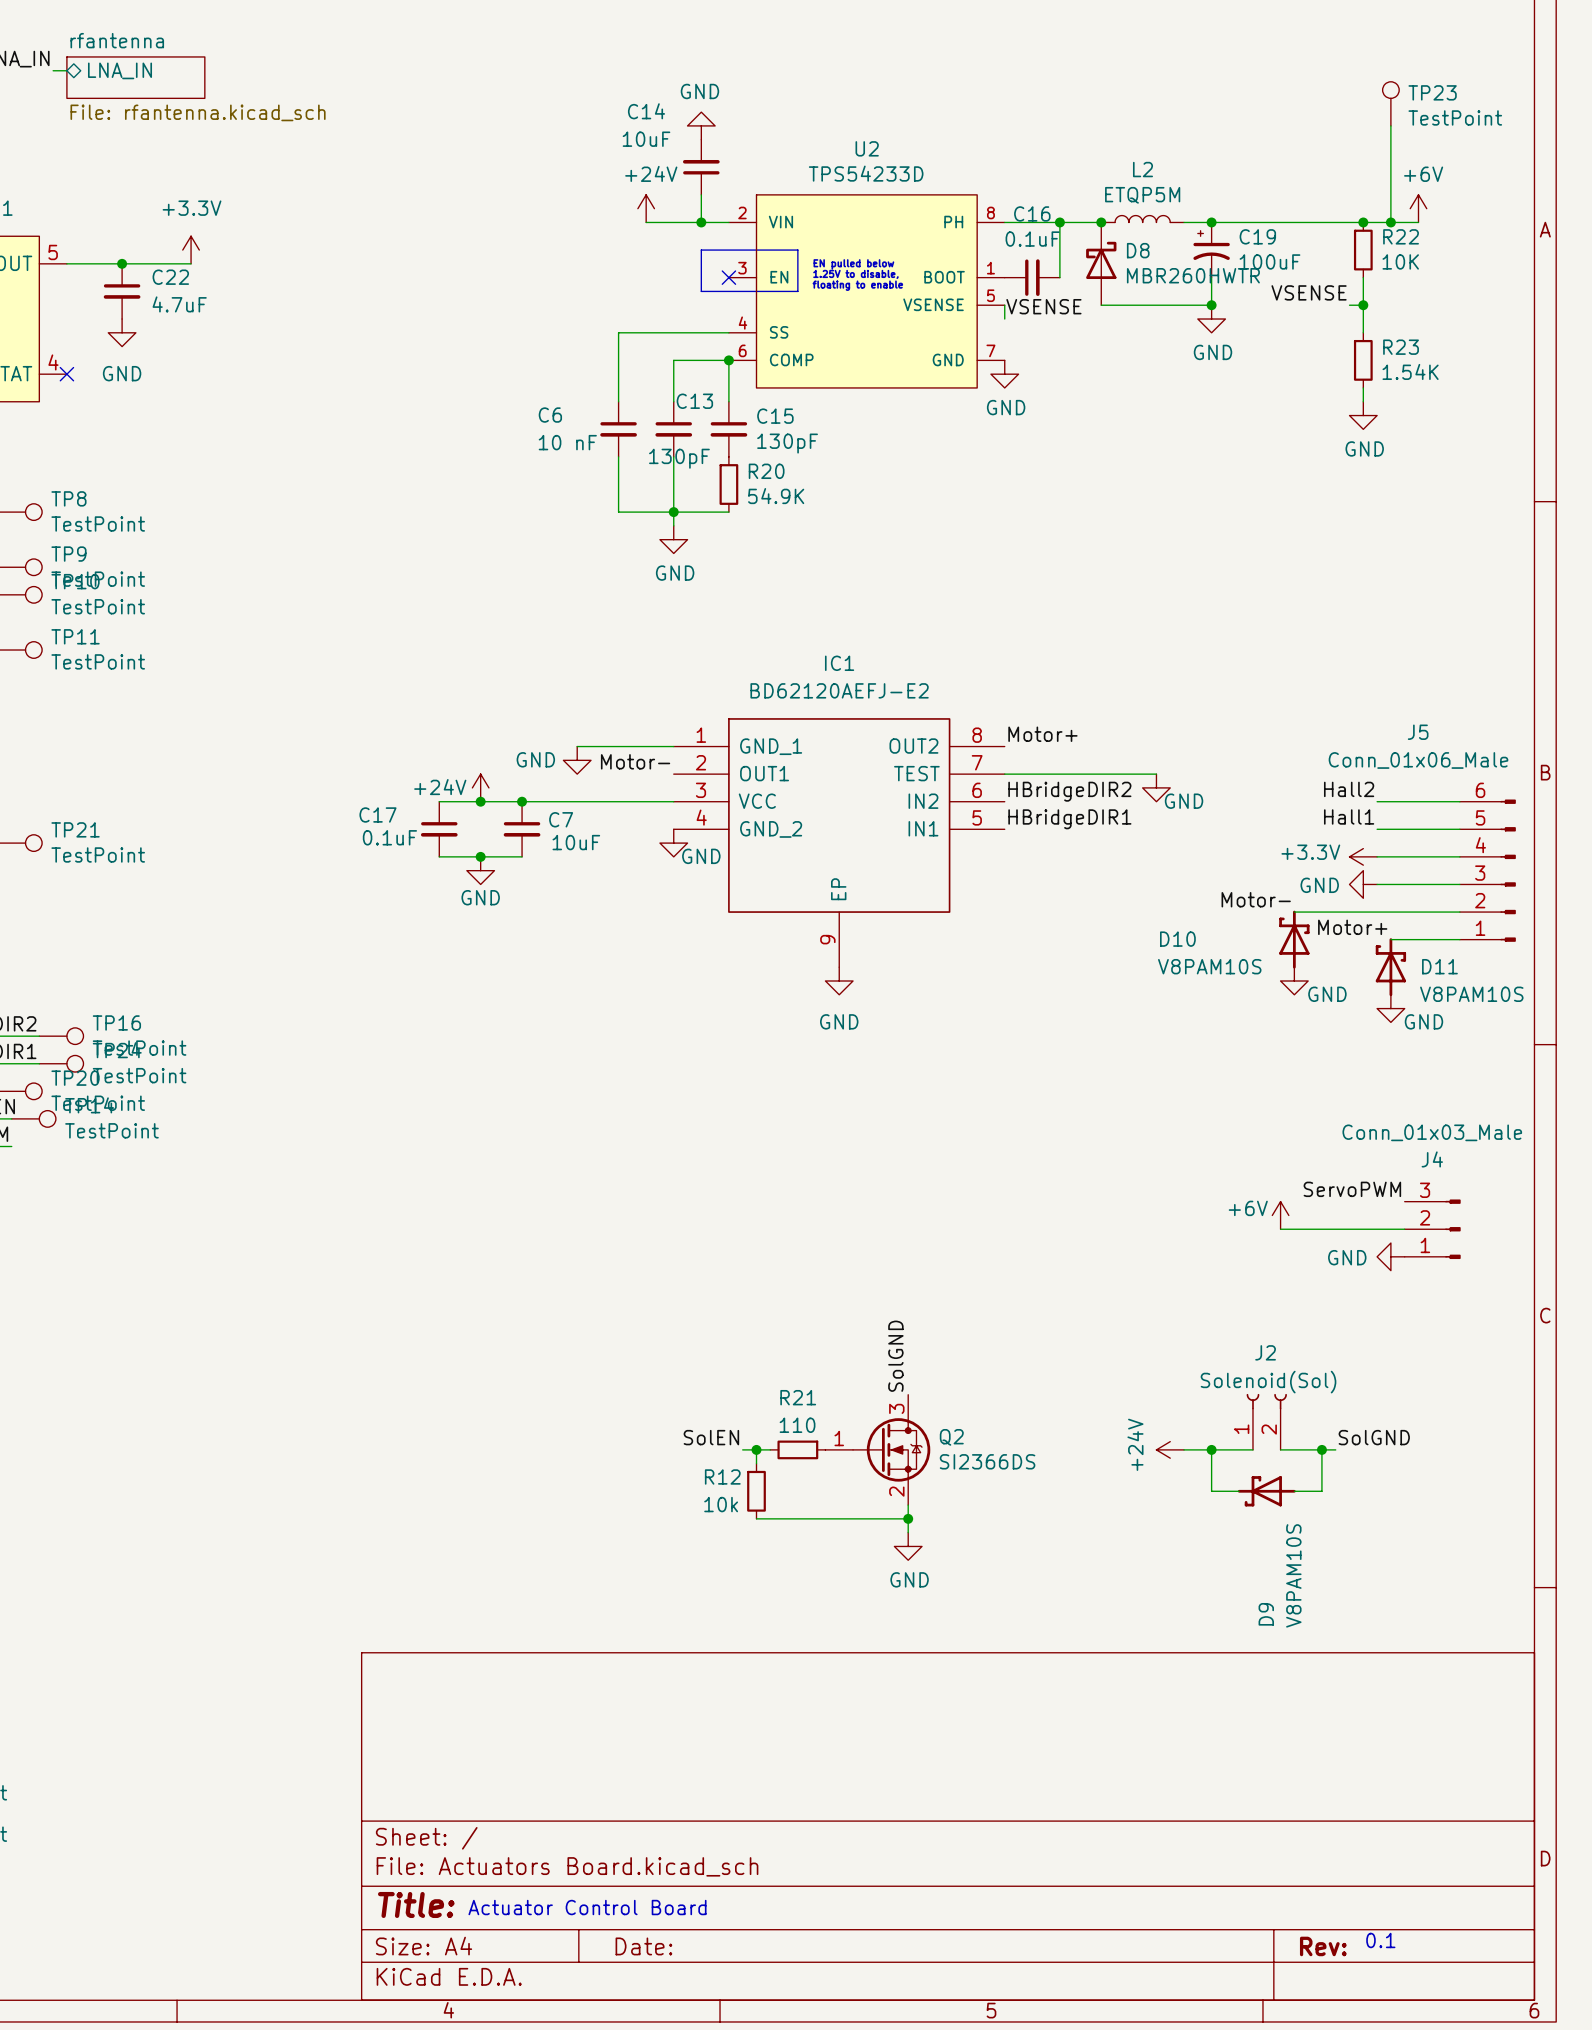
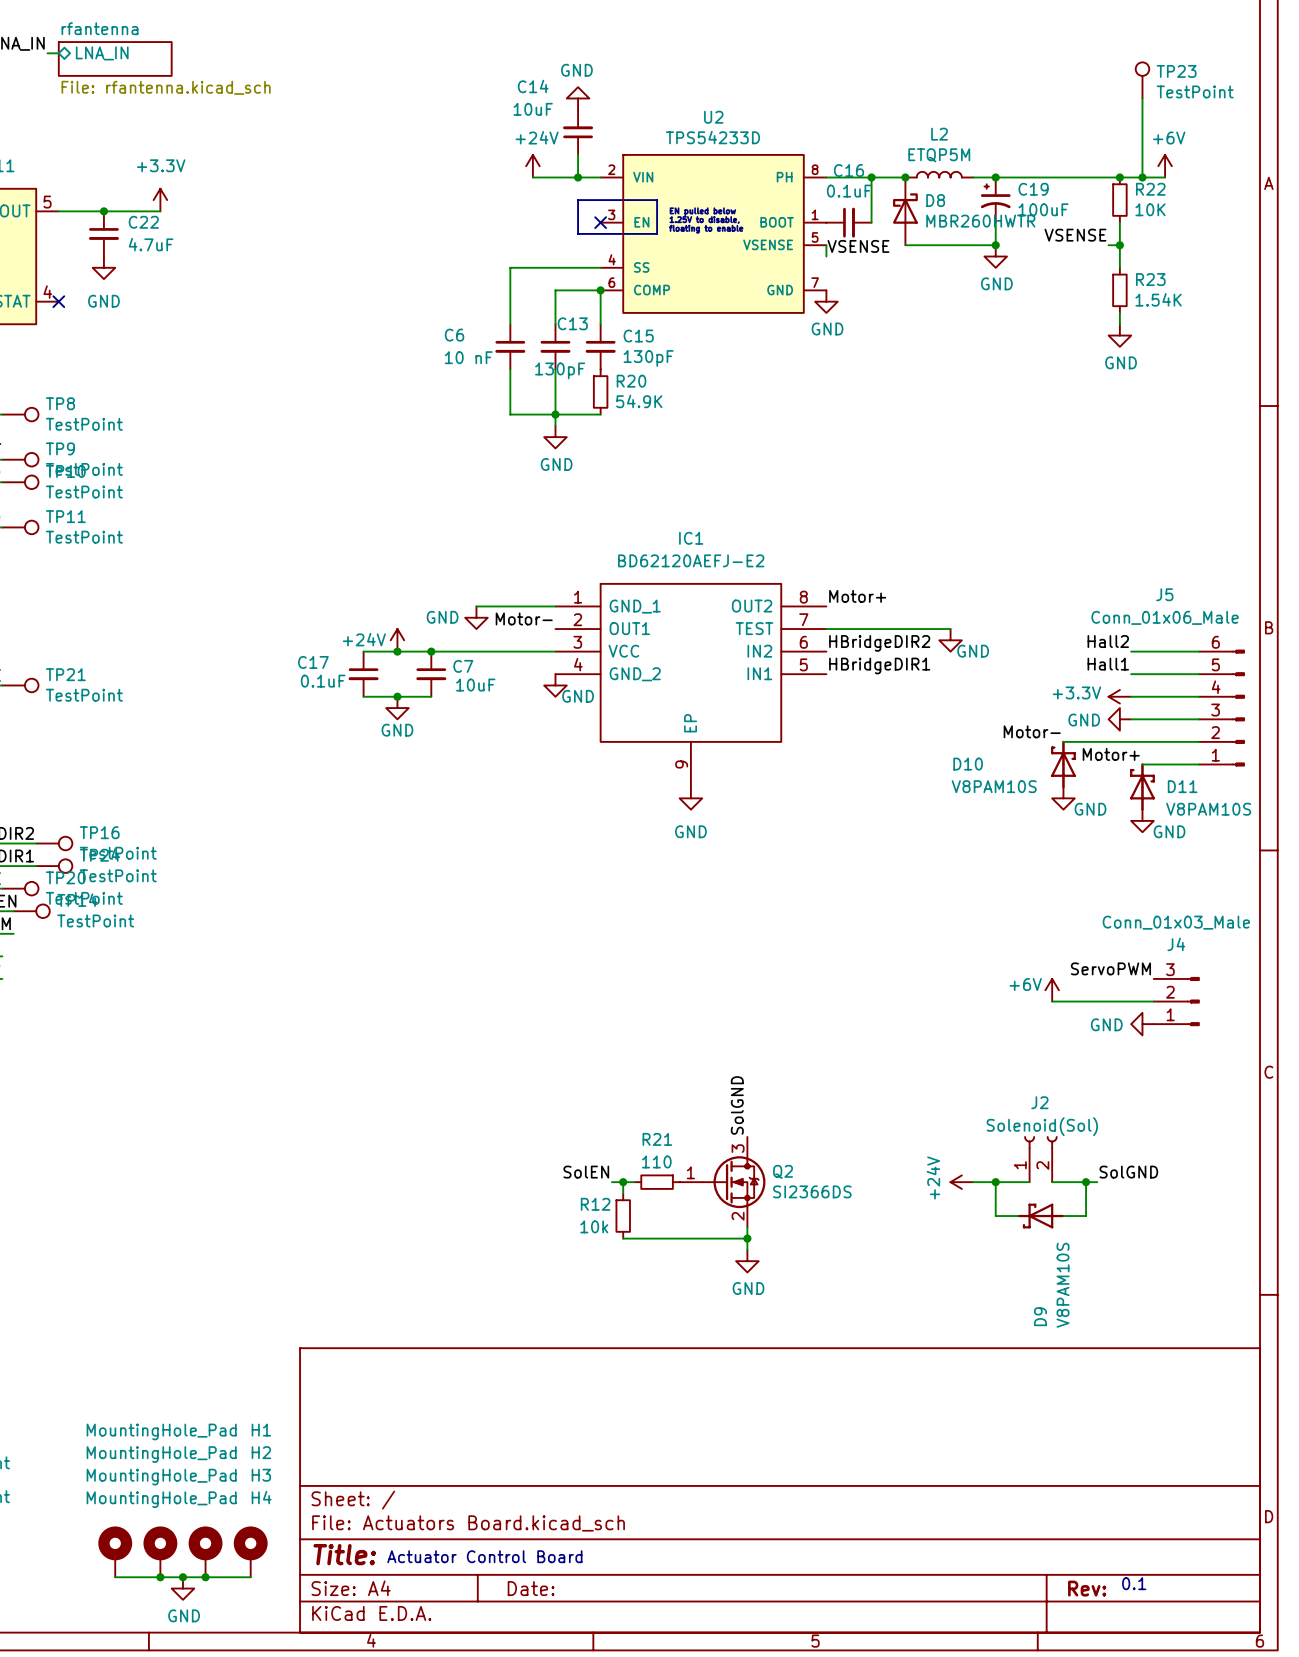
H1: none -> MountingHole_Pad (115, 1551)
H2: none -> MountingHole_Pad (160, 1551)
H3: none -> MountingHole_Pad (205, 1551)
H4: none -> MountingHole_Pad (250, 1551)
wire: none -> (115, 1577) (250, 1577)
junction: none -> (160, 1577)
junction: none -> (182, 1577)
junction: none -> (205, 1577)
power symbol: none -> GND (182, 1588)

